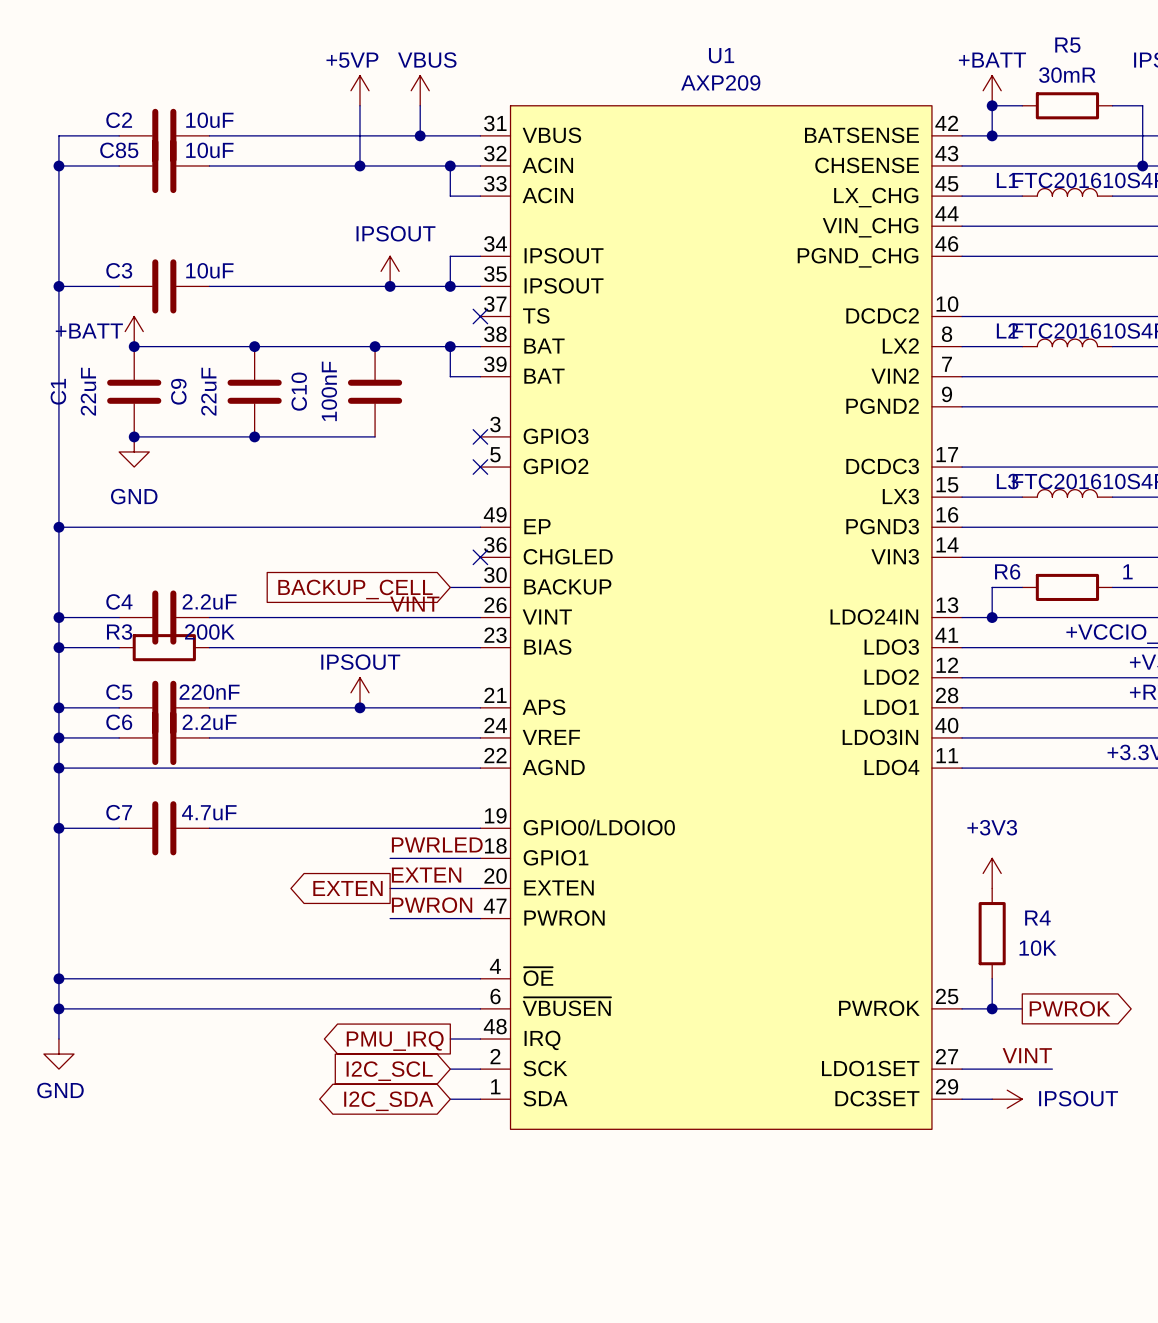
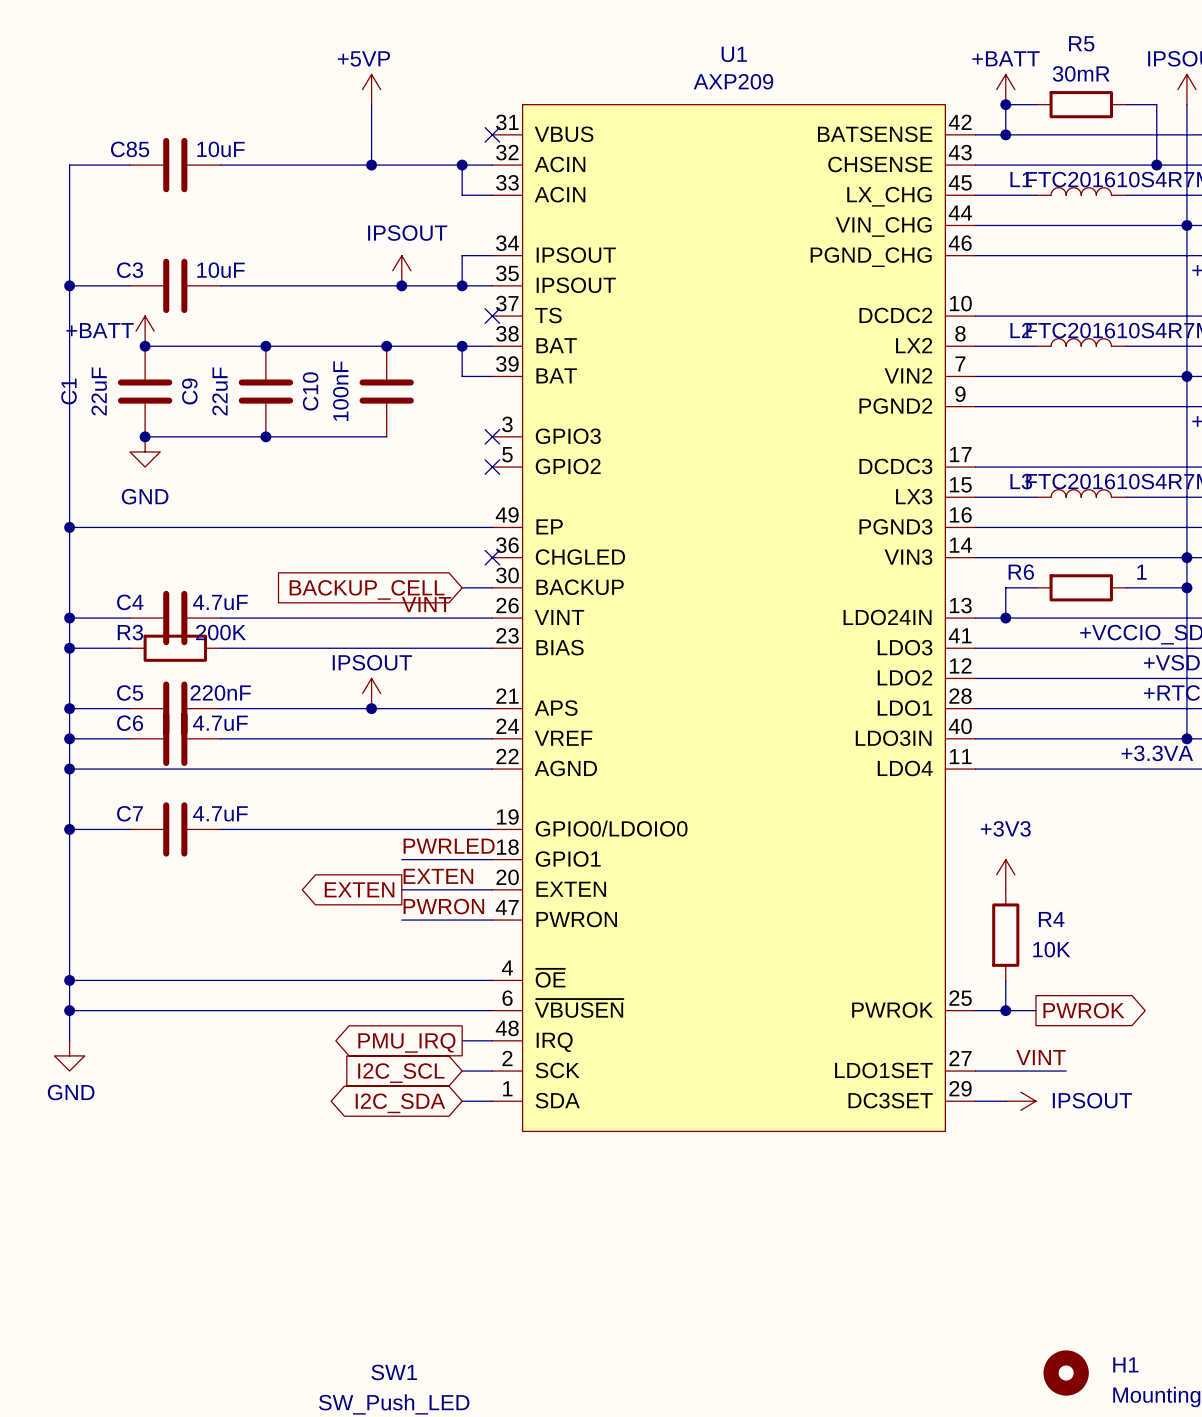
power symbol: VBUS (420, 90) -> none
wire: (420, 105) (420, 135) -> none
wire: (119, 135) (58, 135) (58, 165) -> none
C2: 10uF (164, 135) -> none
wire: (209, 135) (480, 135) -> none
junction: (420, 135) -> none
no-connect mark: none -> (492, 134)
junction: (58, 165) -> none
C4 value: 2.2uF (209, 601) -> 4.7uF (220, 602)
C6 value: 2.2uF (209, 722) -> 4.7uF (220, 723)

